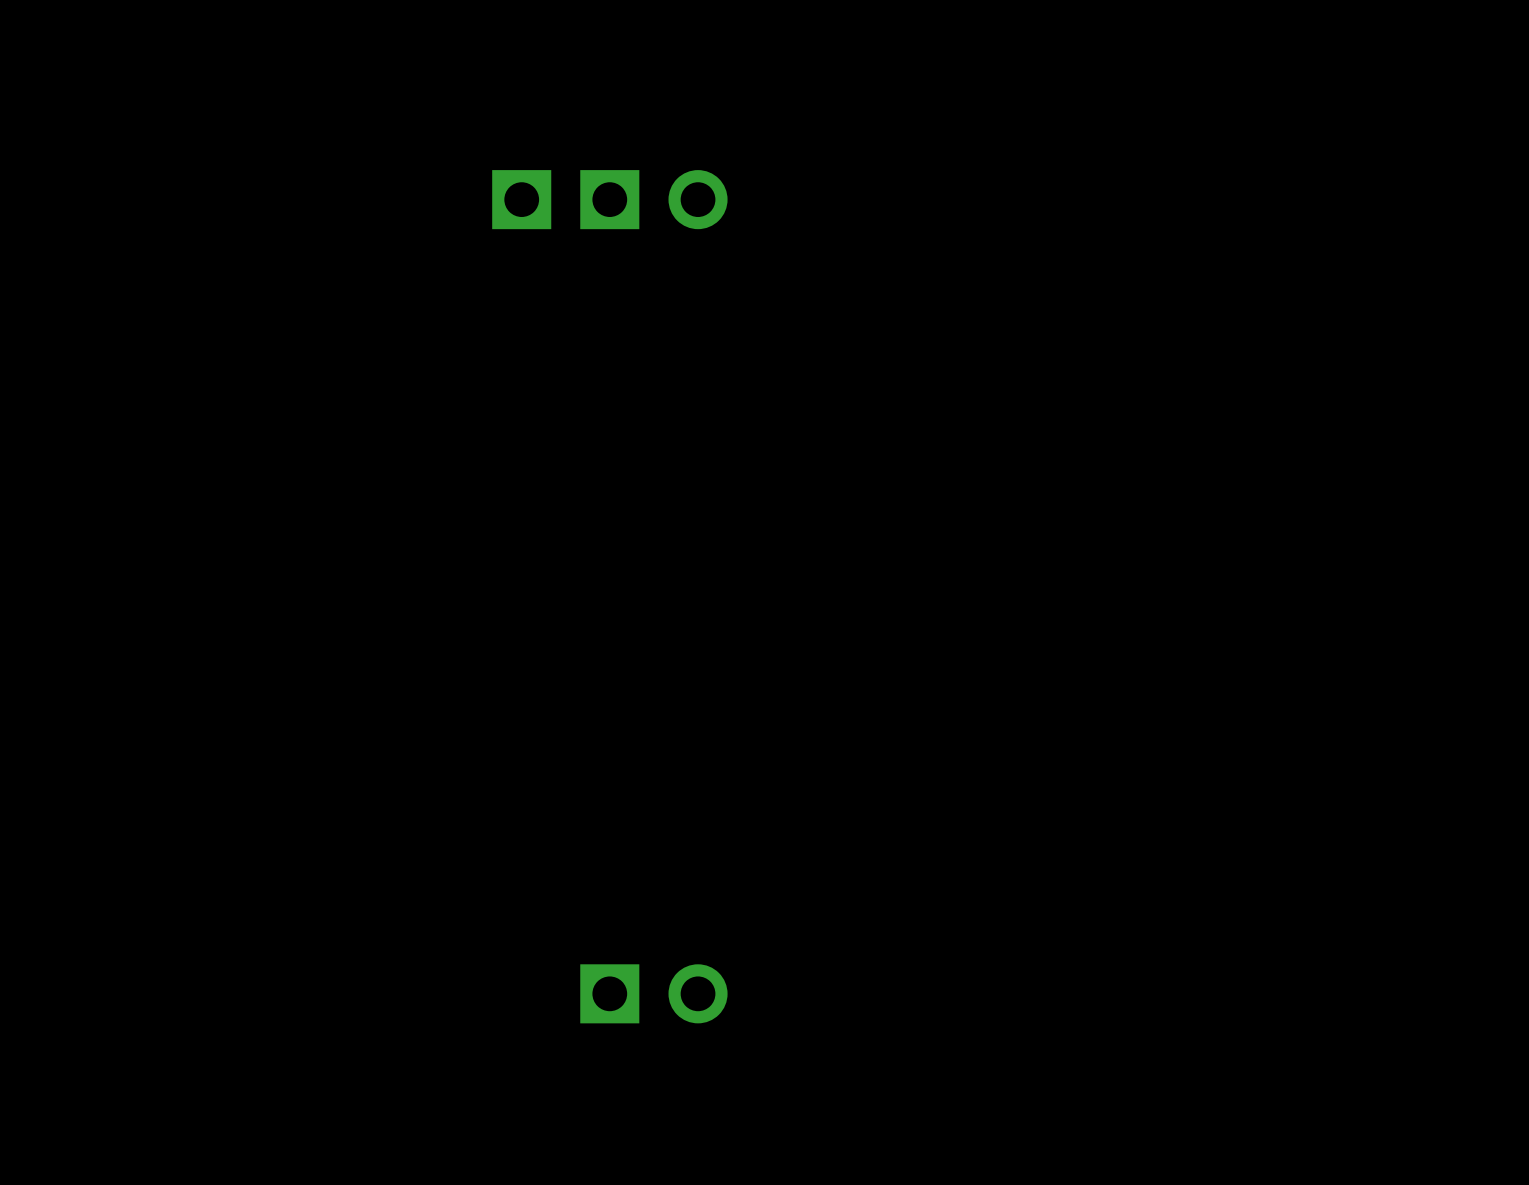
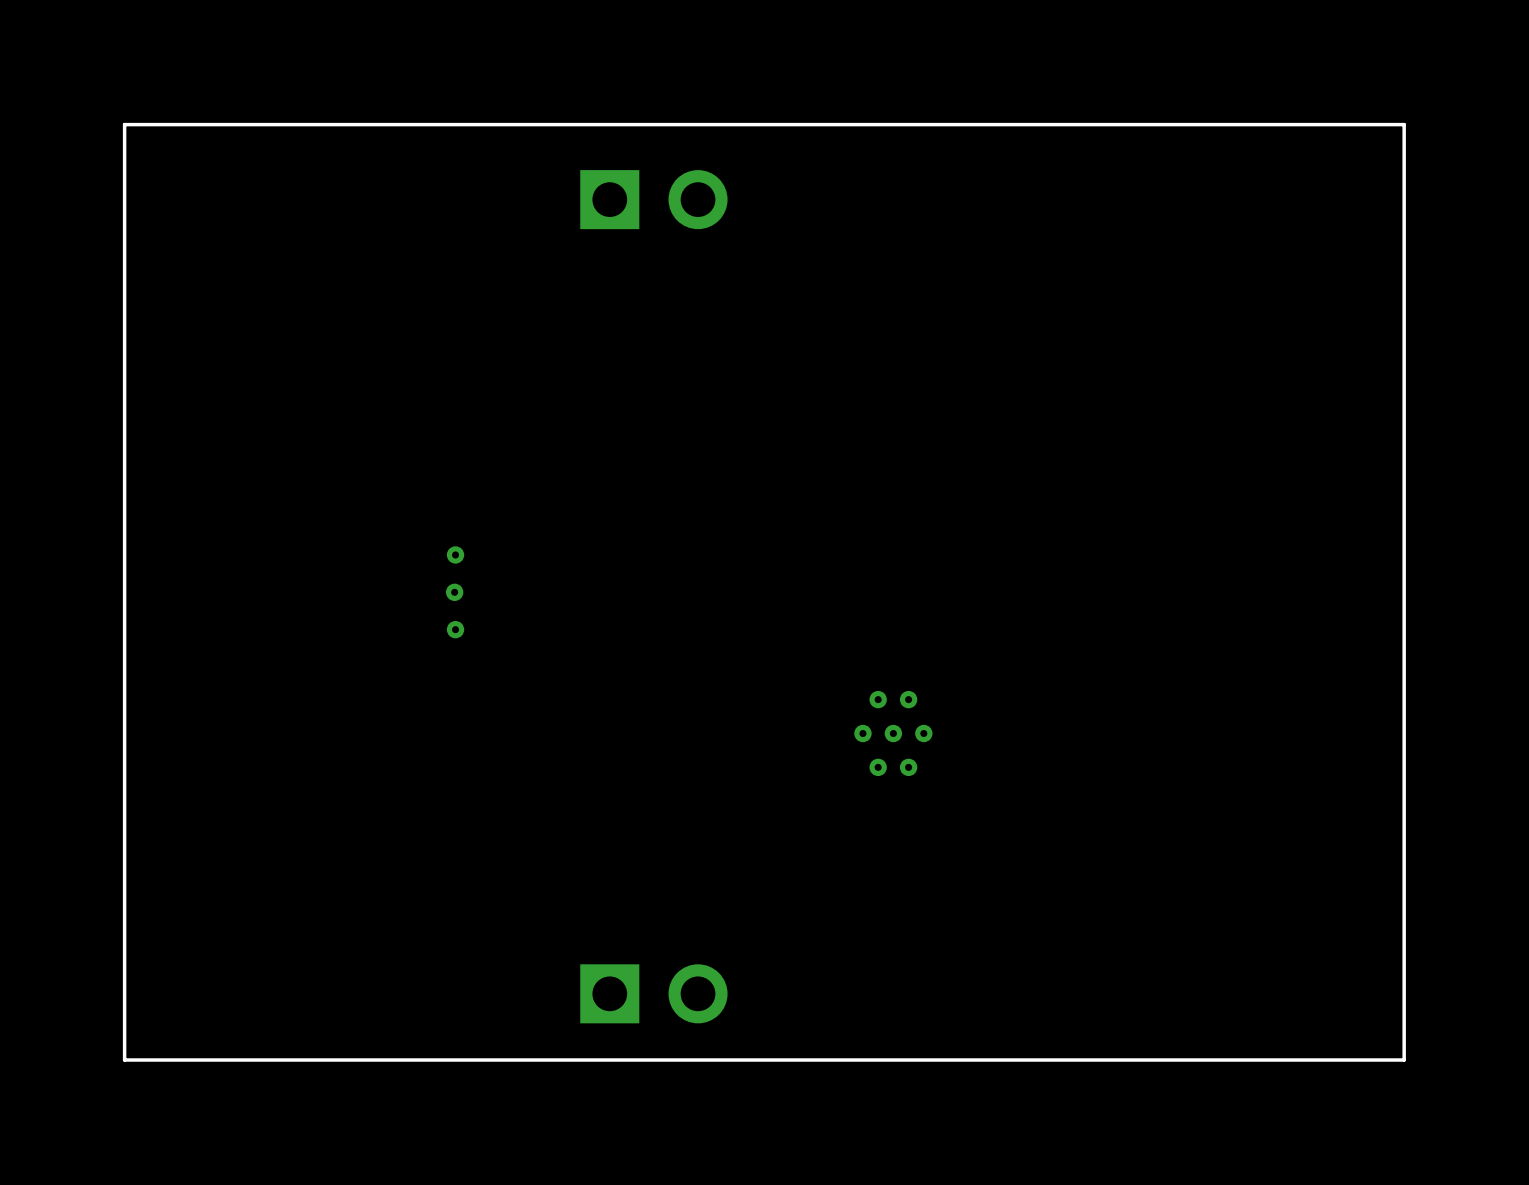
board edge: none -> (1404, 124) (1404, 1060) (124, 1060) (124, 124) (1404, 124)
part: (521, 199) -> none
part: none -> (455, 592)
part: none -> (893, 733)

